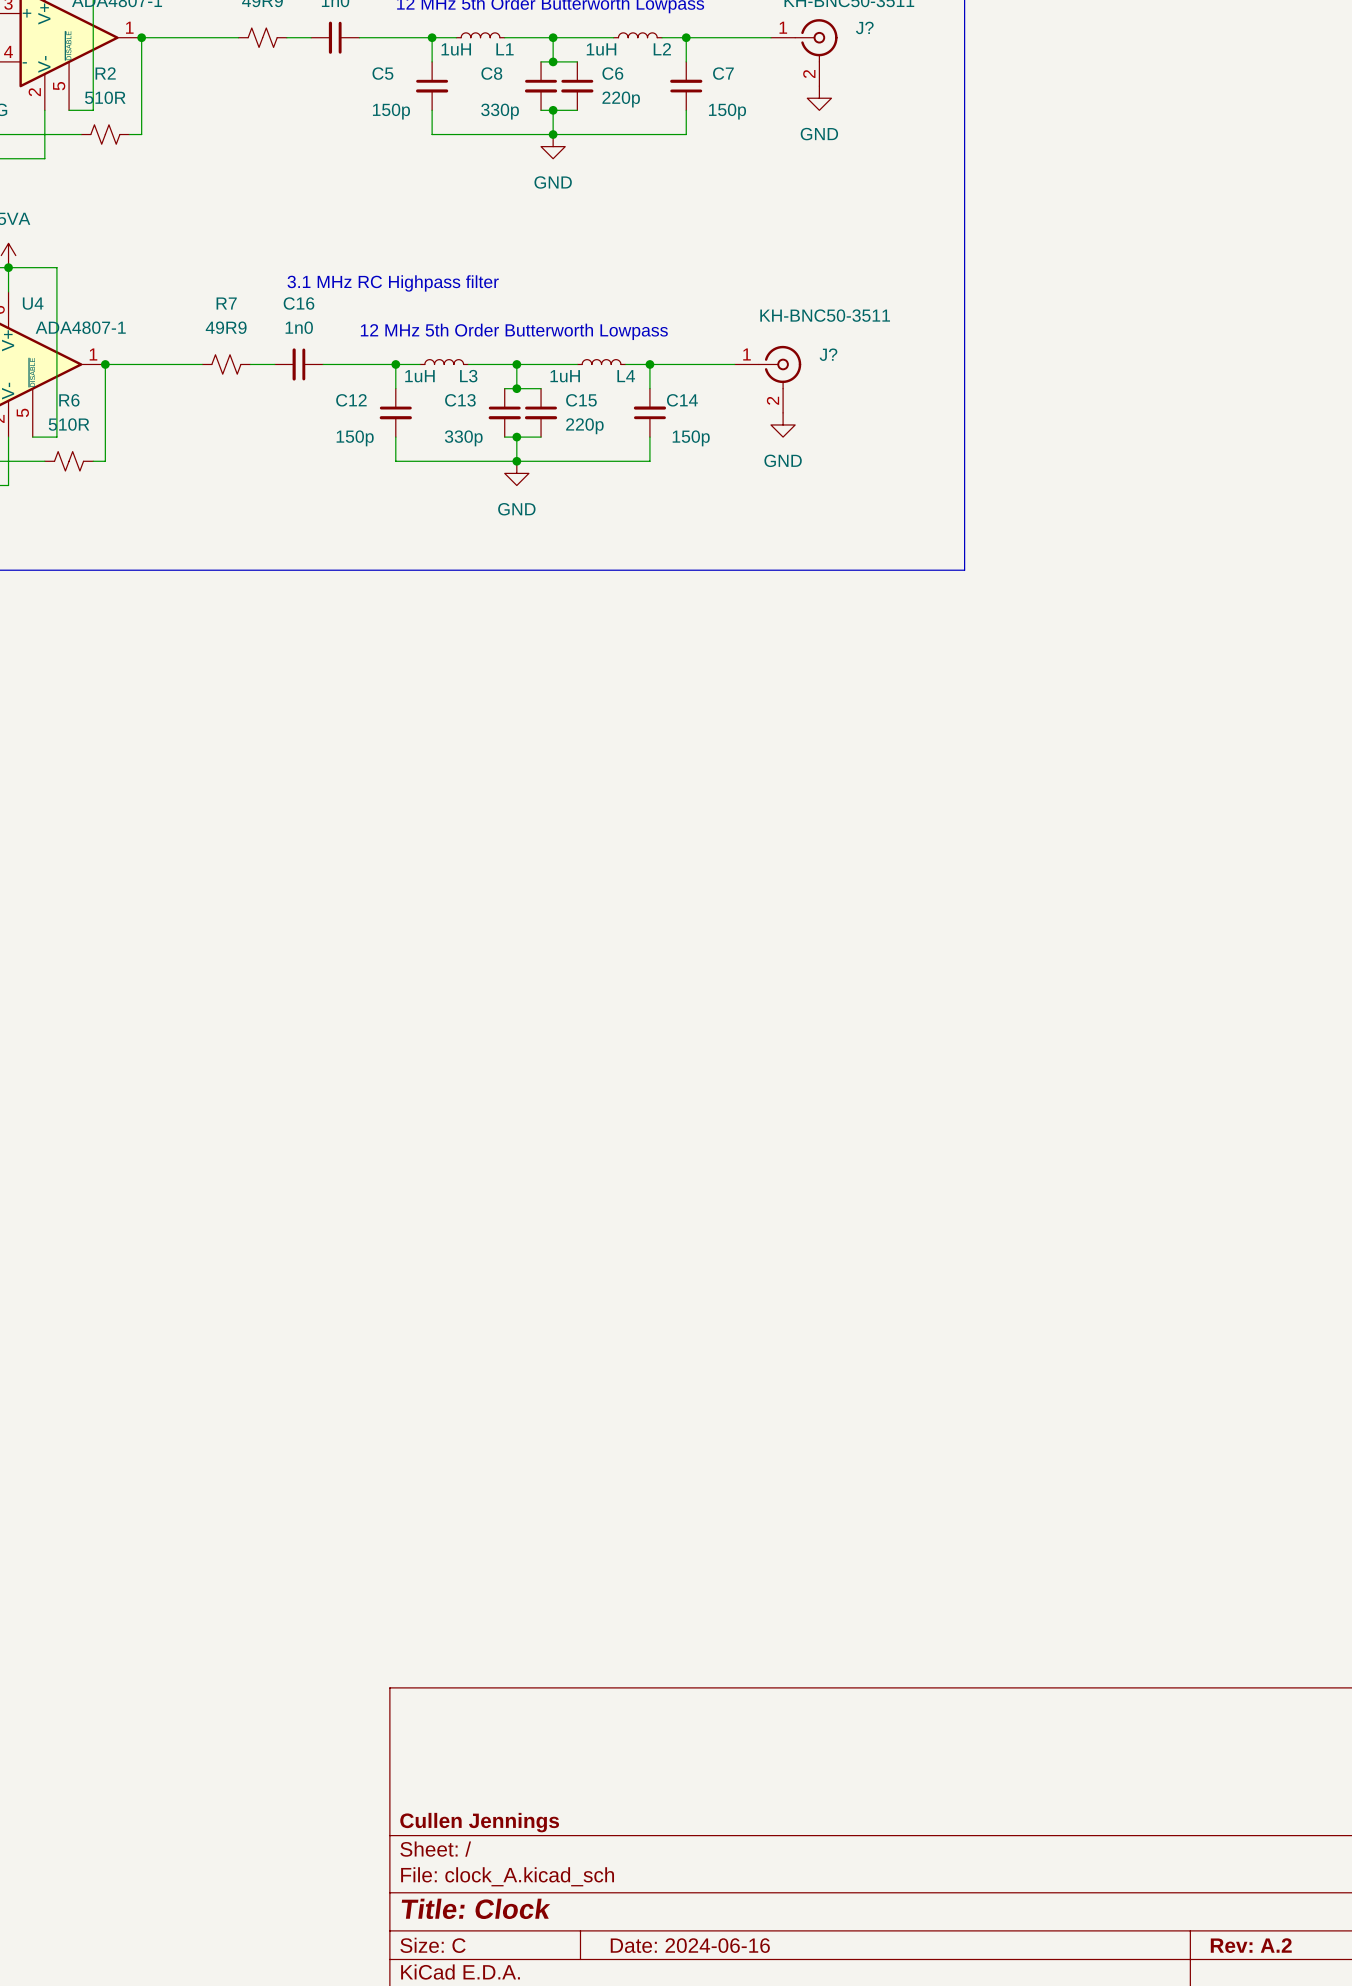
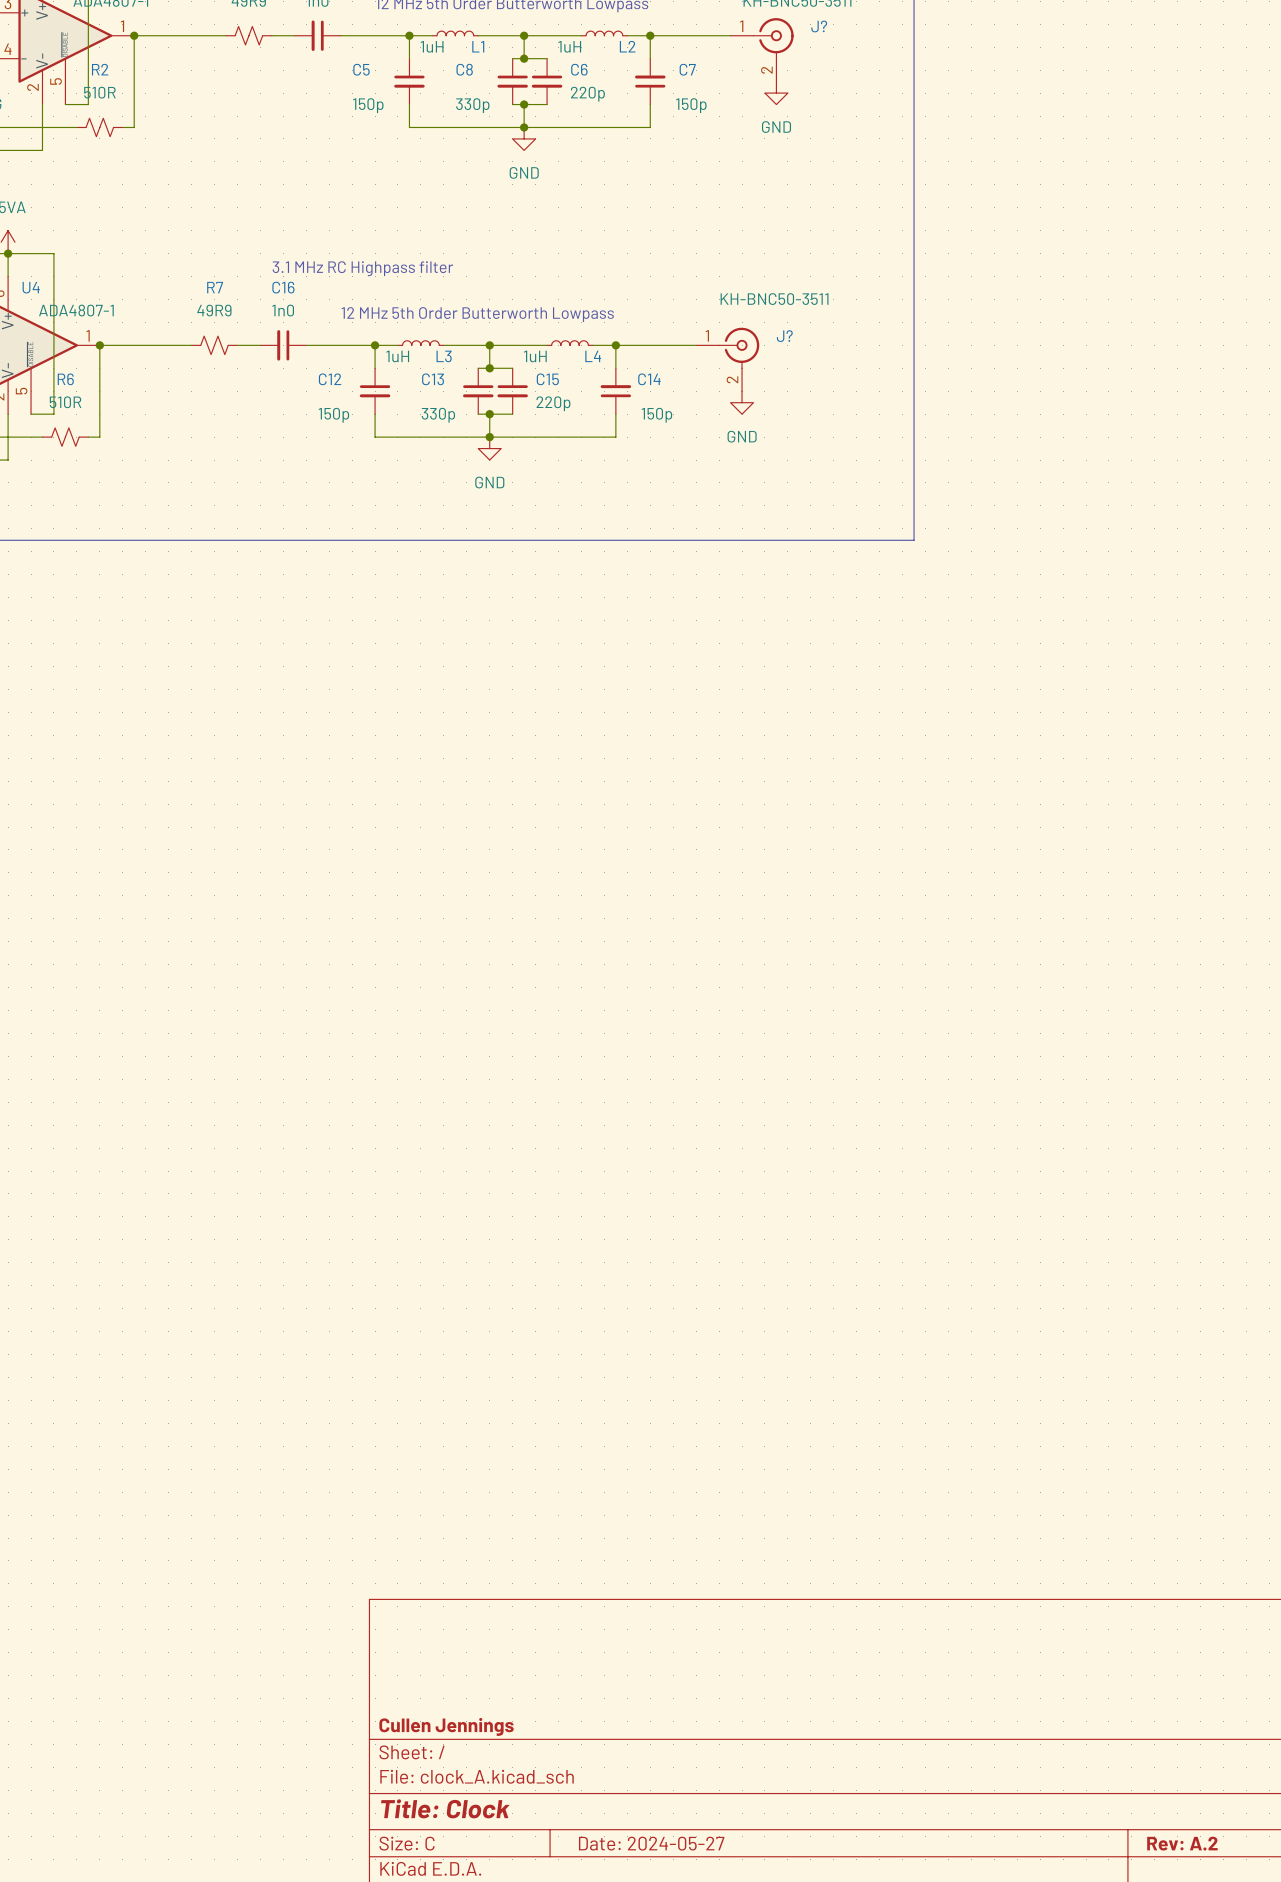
title block: Date: 2024-06-16 (690, 1945) -> Date: 2024-05-27 (651, 1843)

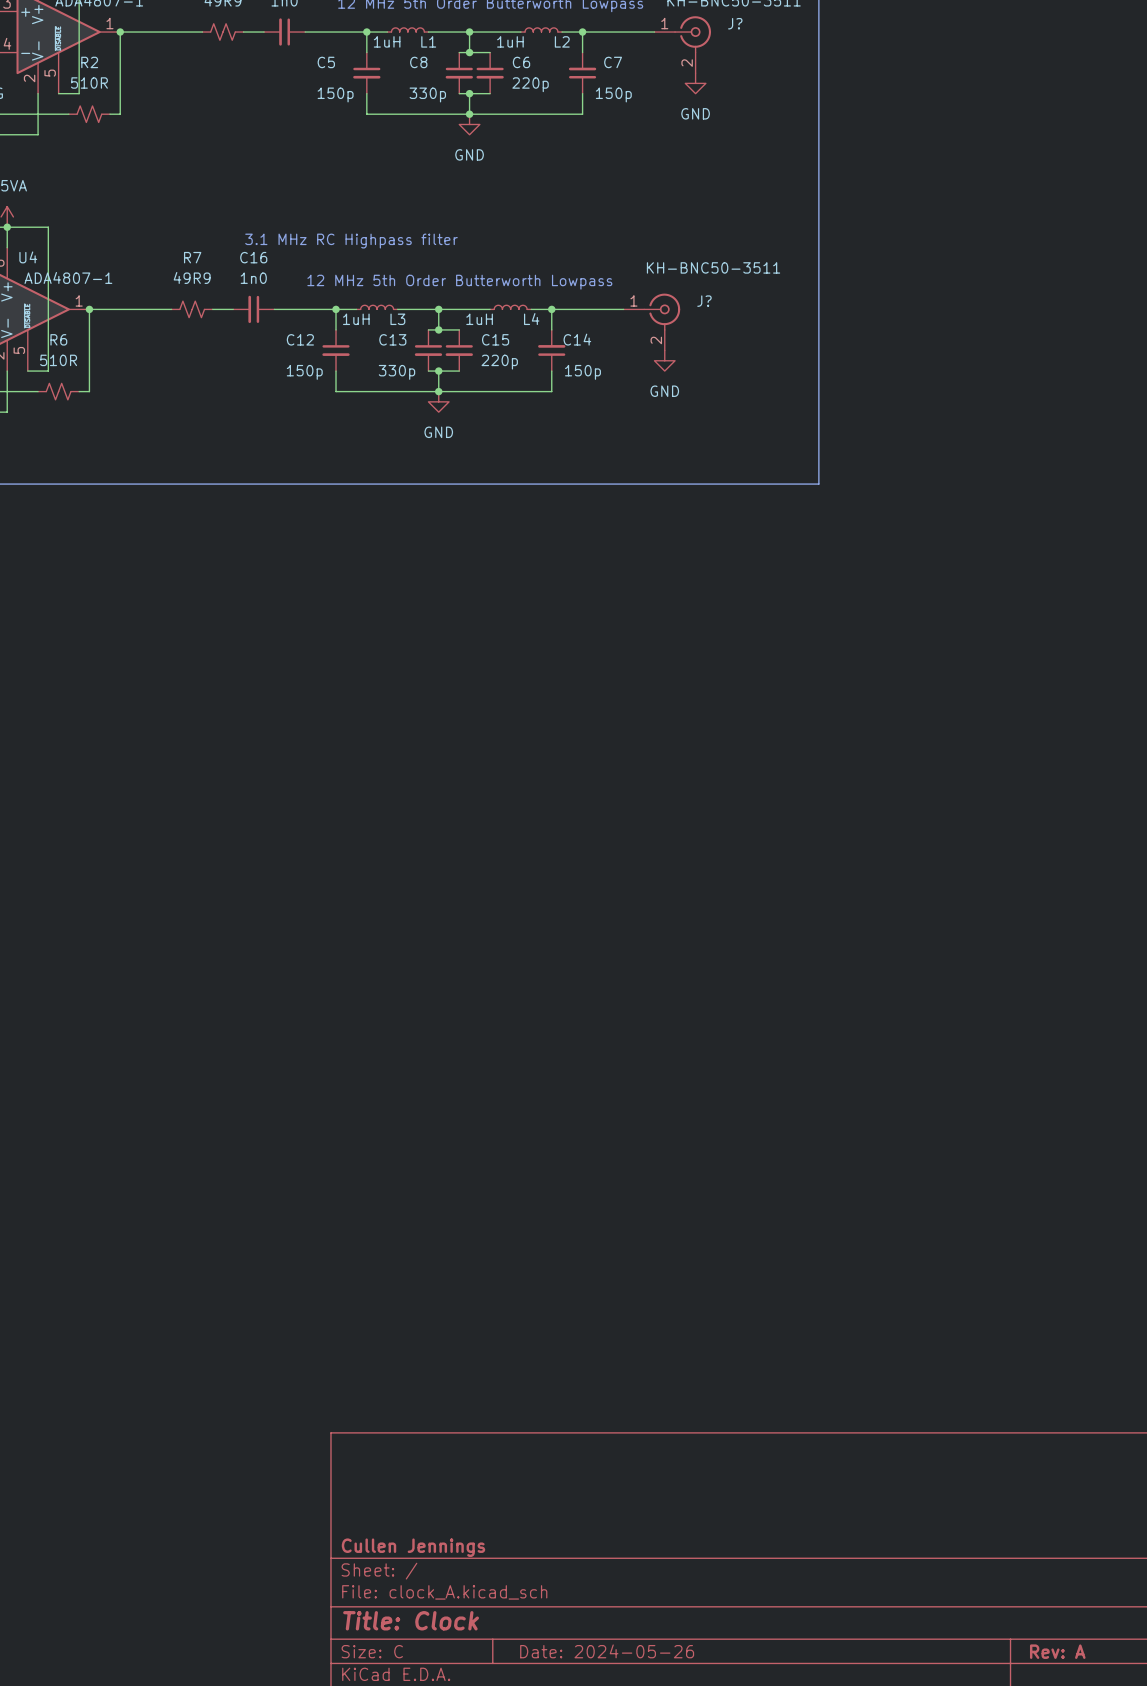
title block: Date: 2024-05-27 (651, 1843) -> Date: 2024-05-26 (607, 1651)
title block: Rev: A.2 (1182, 1843) -> Rev: A (1057, 1651)

